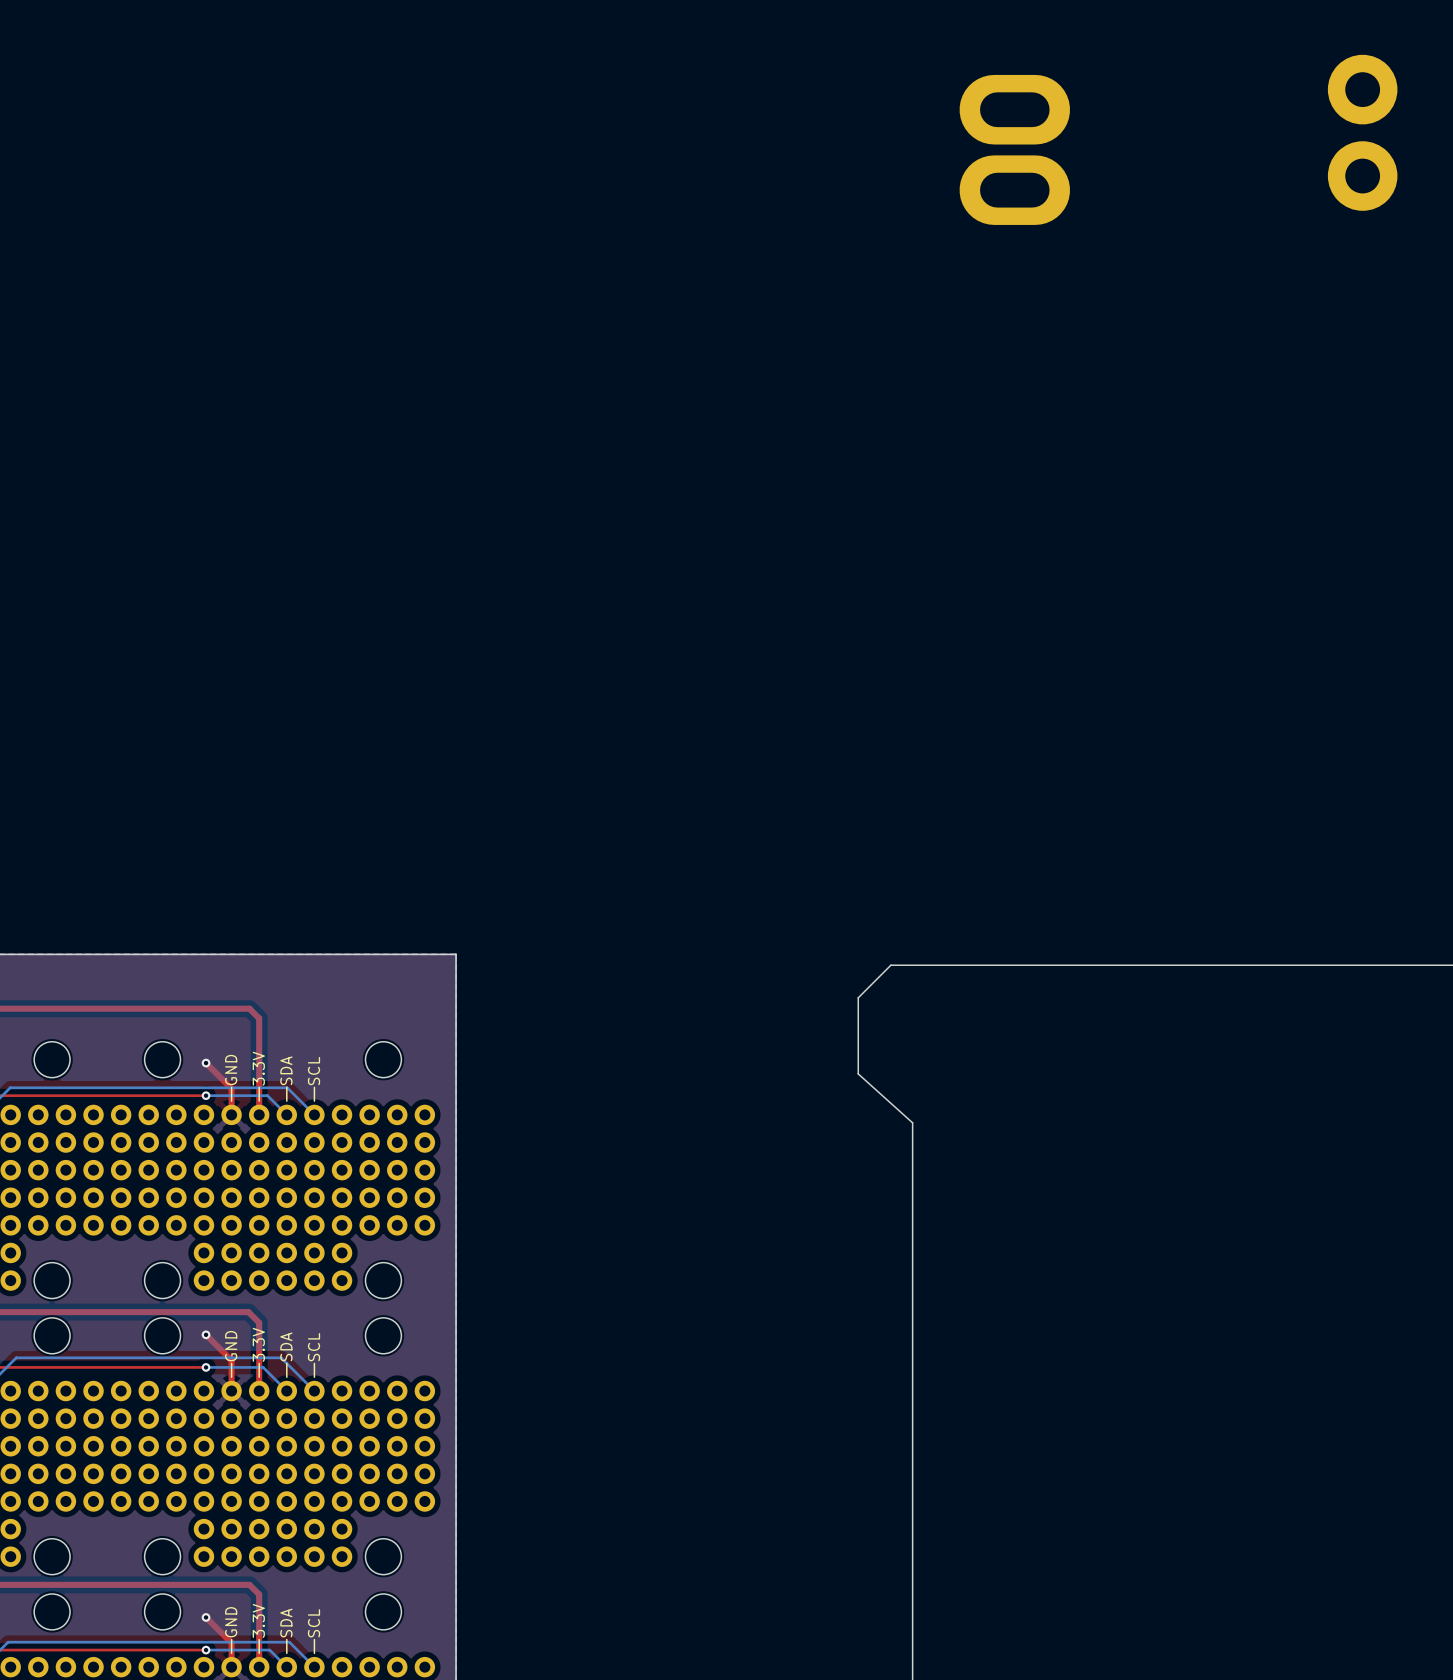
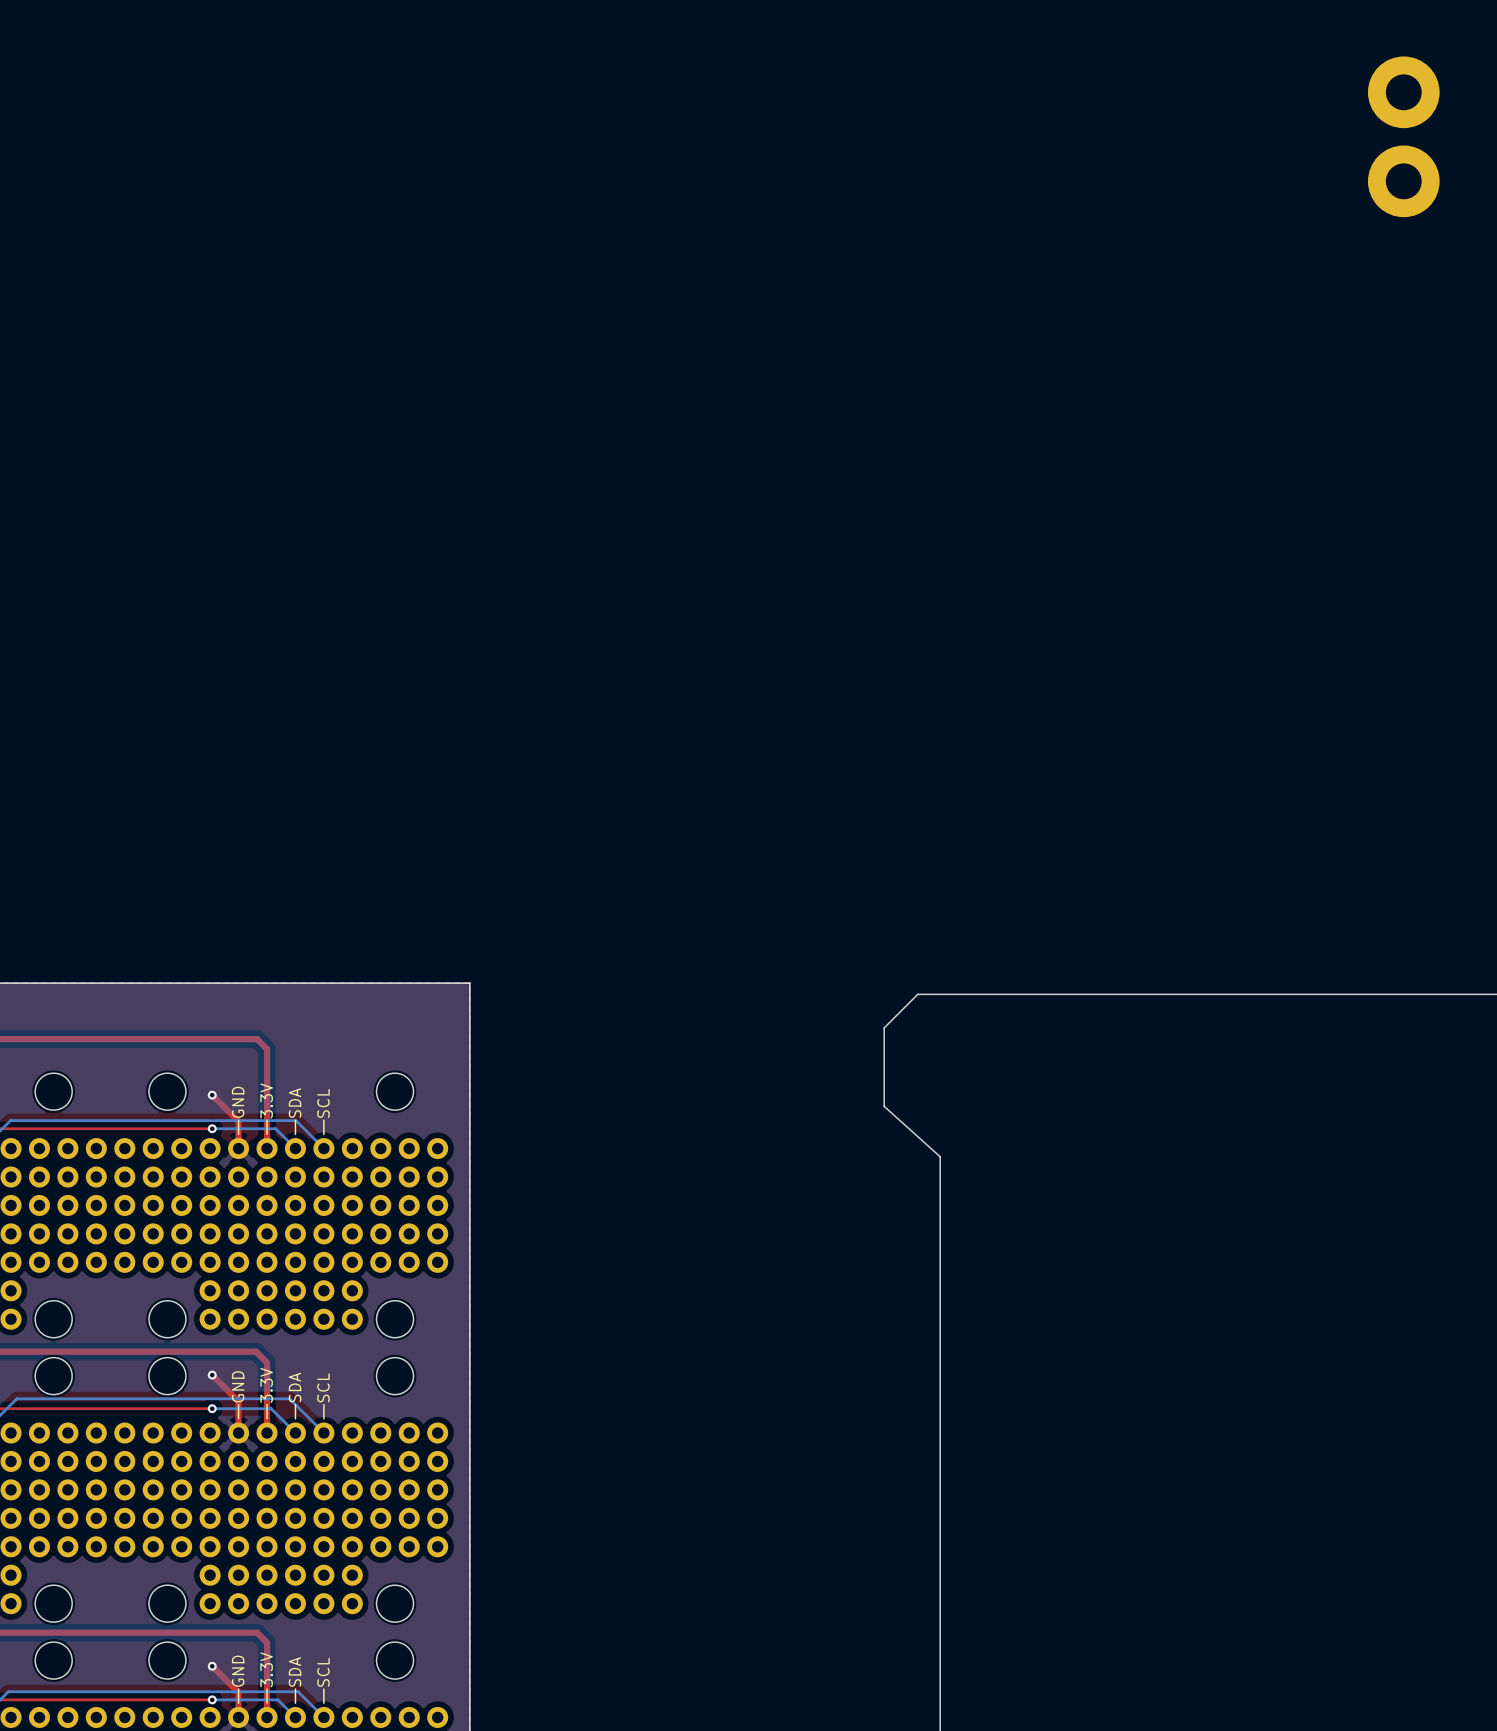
part: (1014, 109) -> none
part: (1014, 190) -> none

